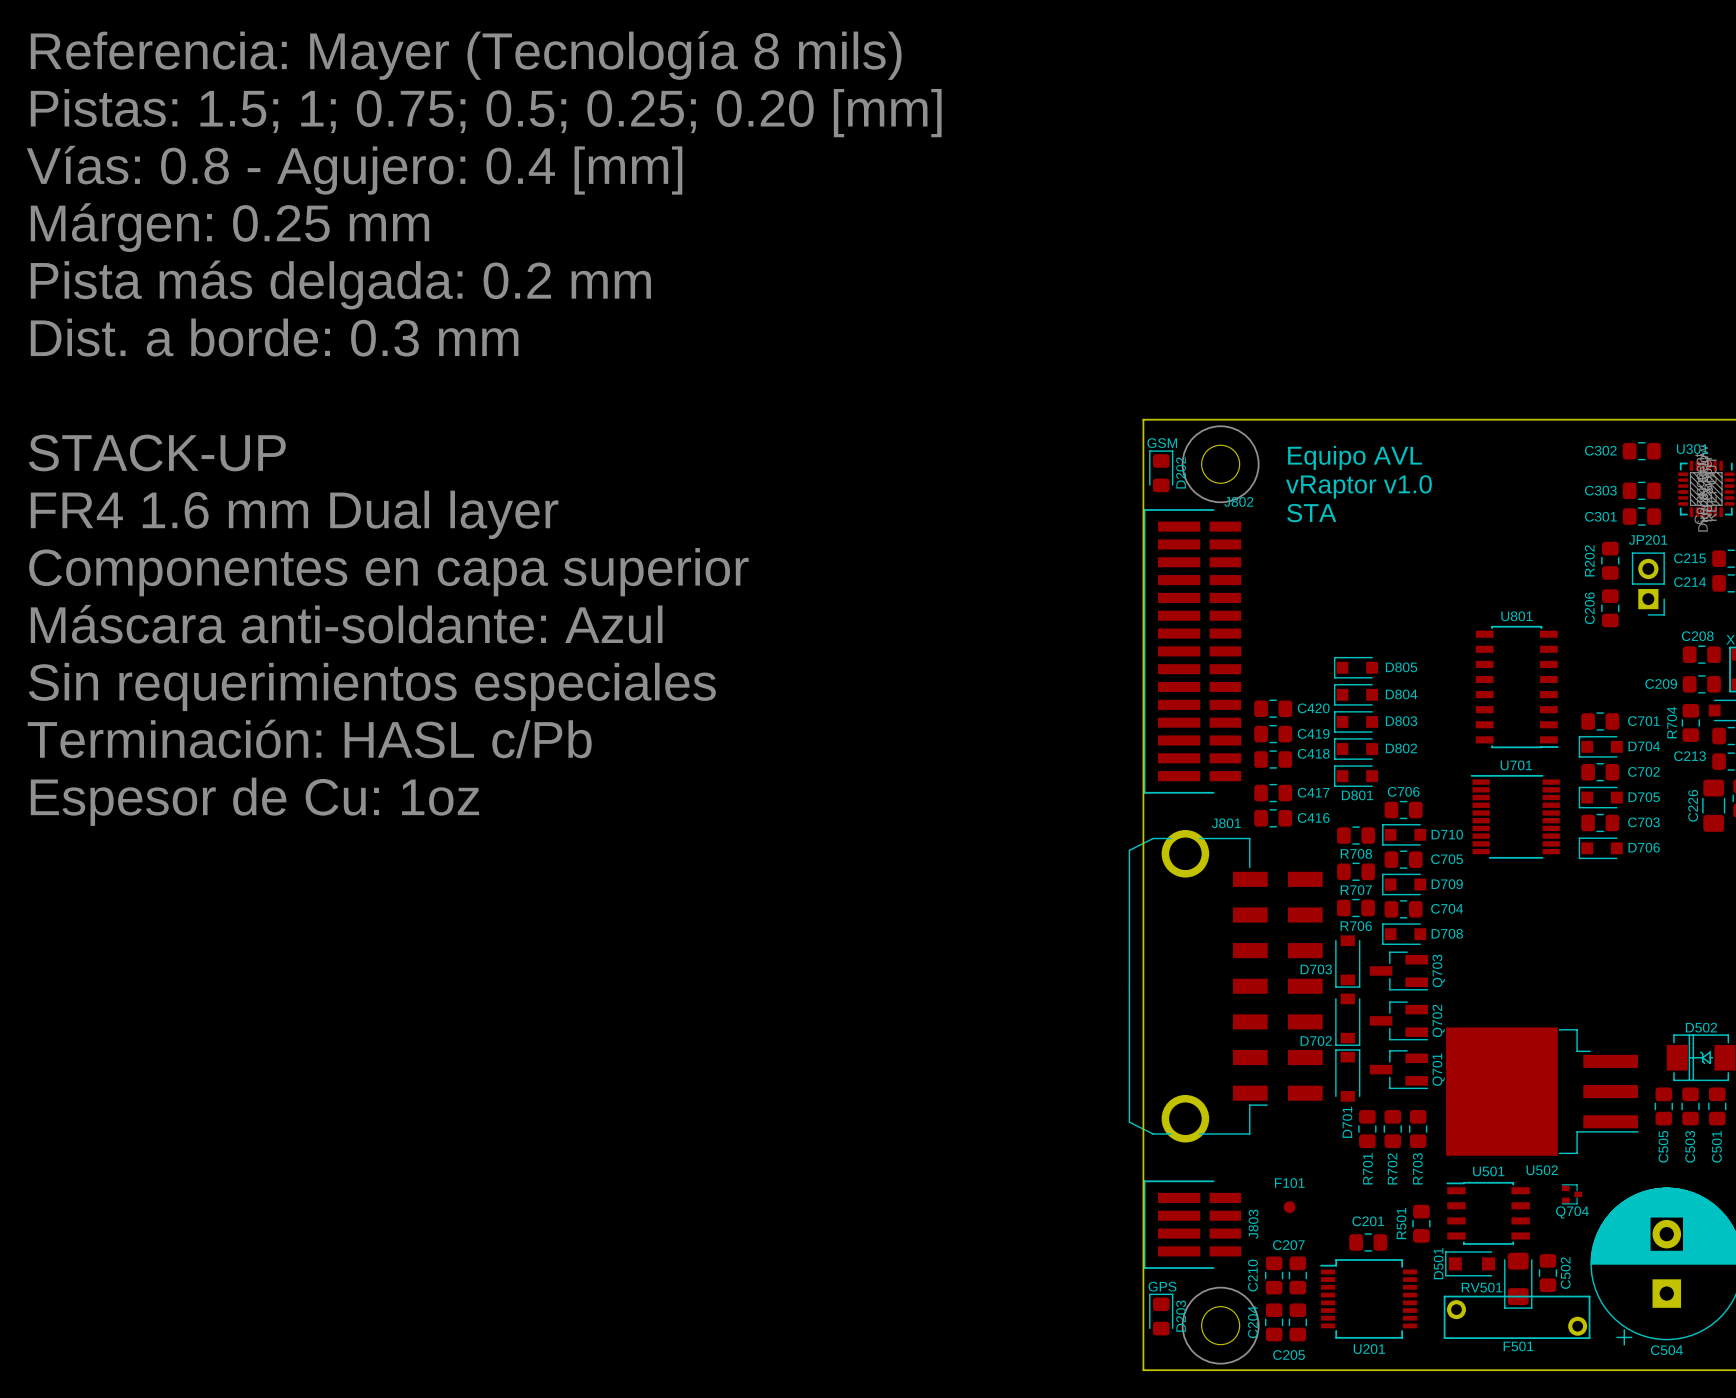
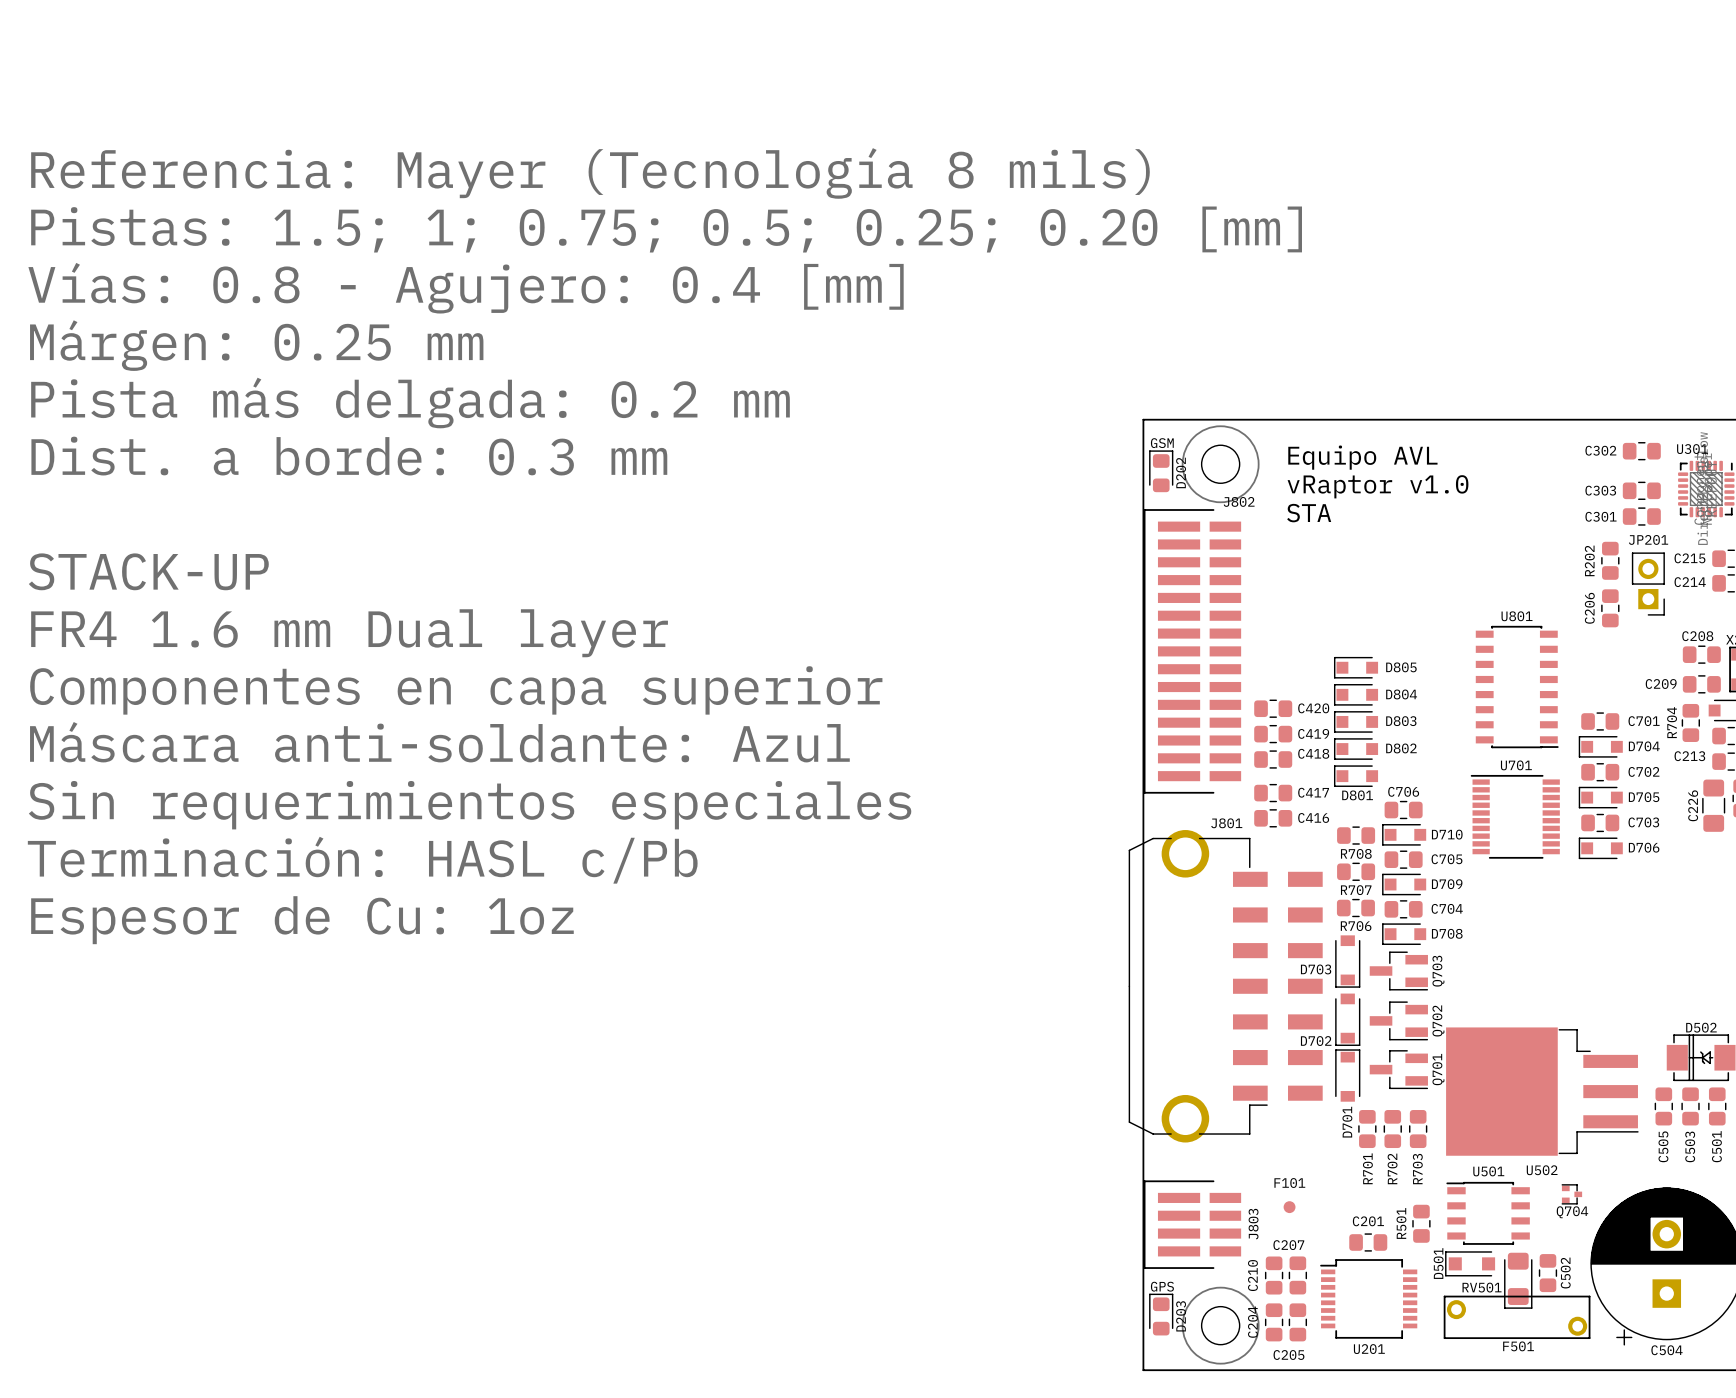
text position: Referencia: Mayer (Tecnología 8 mils) (466, 55) -> Referencia: Mayer (Tecnología 8 mils) (590, 173)
text position: Pistas: 1.5; 1; 0.75; 0.5; 0.25; 0.20 [mm] (486, 113) -> Pistas: 1.5; 1; 0.75; 0.5; 0.25; 0.20 [mm] (666, 229)
text position: Vías: 0.8 - Agujero: 0.4 [mm] (354, 170) -> Vías: 0.8 - Agujero: 0.4 [mm] (466, 288)
text position: Márgen: 0.25 mm (229, 227) -> Márgen: 0.25 mm (256, 345)
text position: Pista más delgada: 0.2 mm (340, 284) -> Pista más delgada: 0.2 mm (410, 403)
text position: Dist. a borde: 0.3 mm (274, 337) -> Dist. a borde: 0.3 mm (349, 456)
text position: STACK-UP (157, 452) -> STACK-UP (148, 571)
text position: FR4 1.6 mm Dual layer (294, 514) -> FR4 1.6 mm Dual layer (349, 633)
text position: Componentes en capa superior (388, 572) -> Componentes en capa superior (456, 690)
text position: Máscara anti-soldante: Azul (346, 624) -> Máscara anti-soldante: Azul (439, 742)
text position: Sin requerimientos especiales (372, 686) -> Sin requerimientos especiales (470, 805)
text position: Terminación: HASL c/Pb (309, 738) -> Terminación: HASL c/Pb (362, 860)
text position: Espesor de Cu: 1oz (254, 801) -> Espesor de Cu: 1oz (302, 920)

